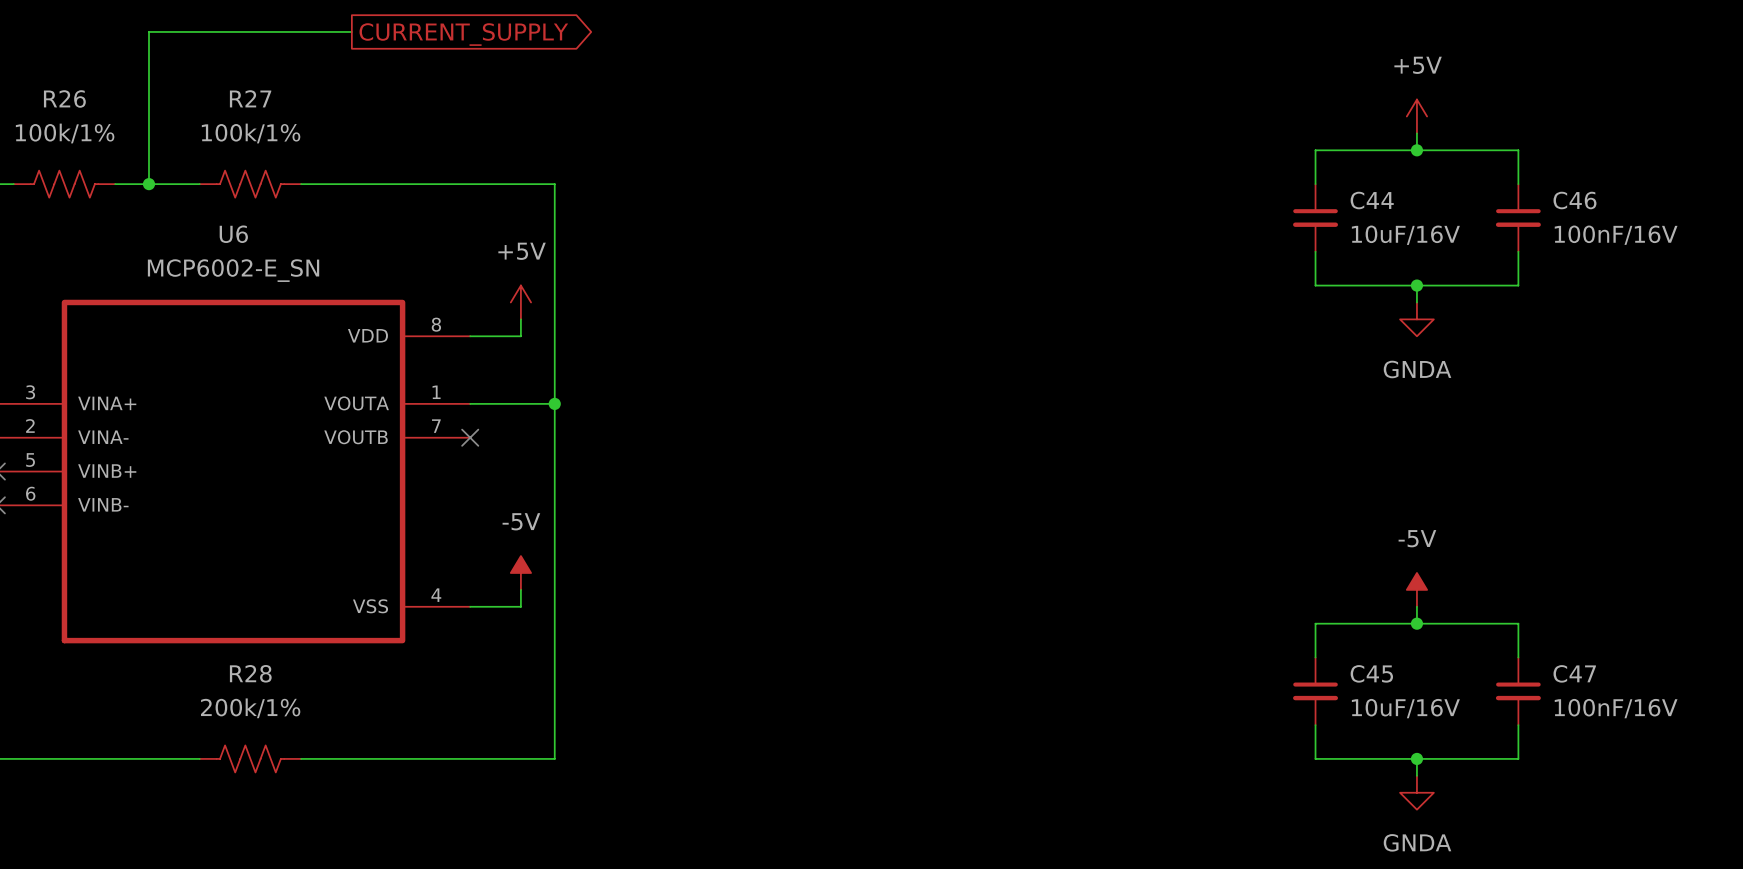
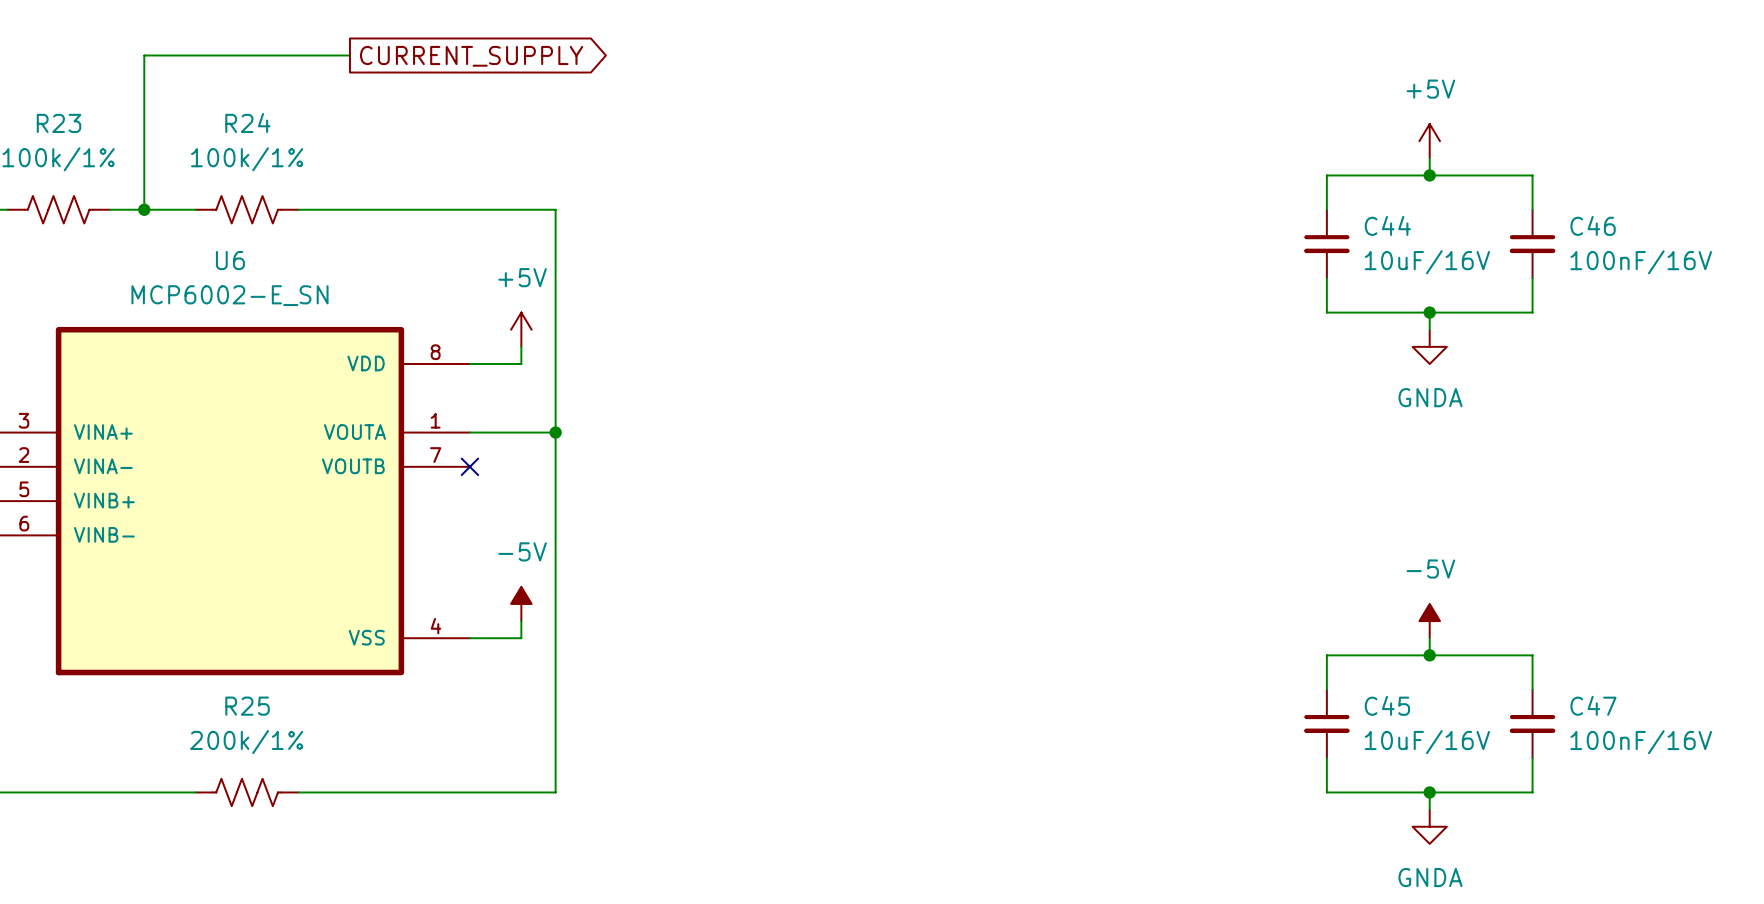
R26 name: R26 (64, 98) -> R23 (59, 123)
R27 name: R27 (250, 98) -> R24 (247, 123)
R28 name: R28 (250, 673) -> R25 (247, 706)

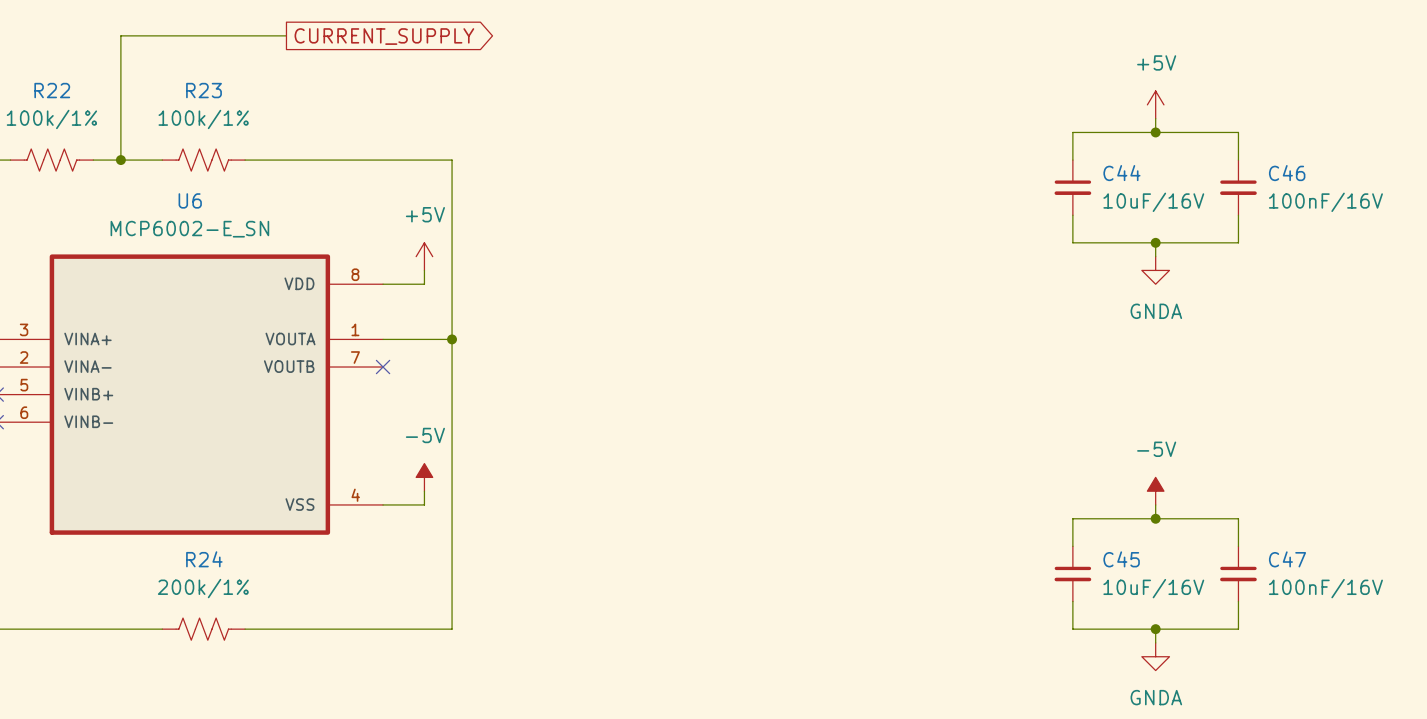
R23 name: R23 (59, 123) -> R22 (52, 90)
R24 name: R24 (247, 123) -> R23 (204, 90)
R25 name: R25 (247, 706) -> R24 (204, 559)

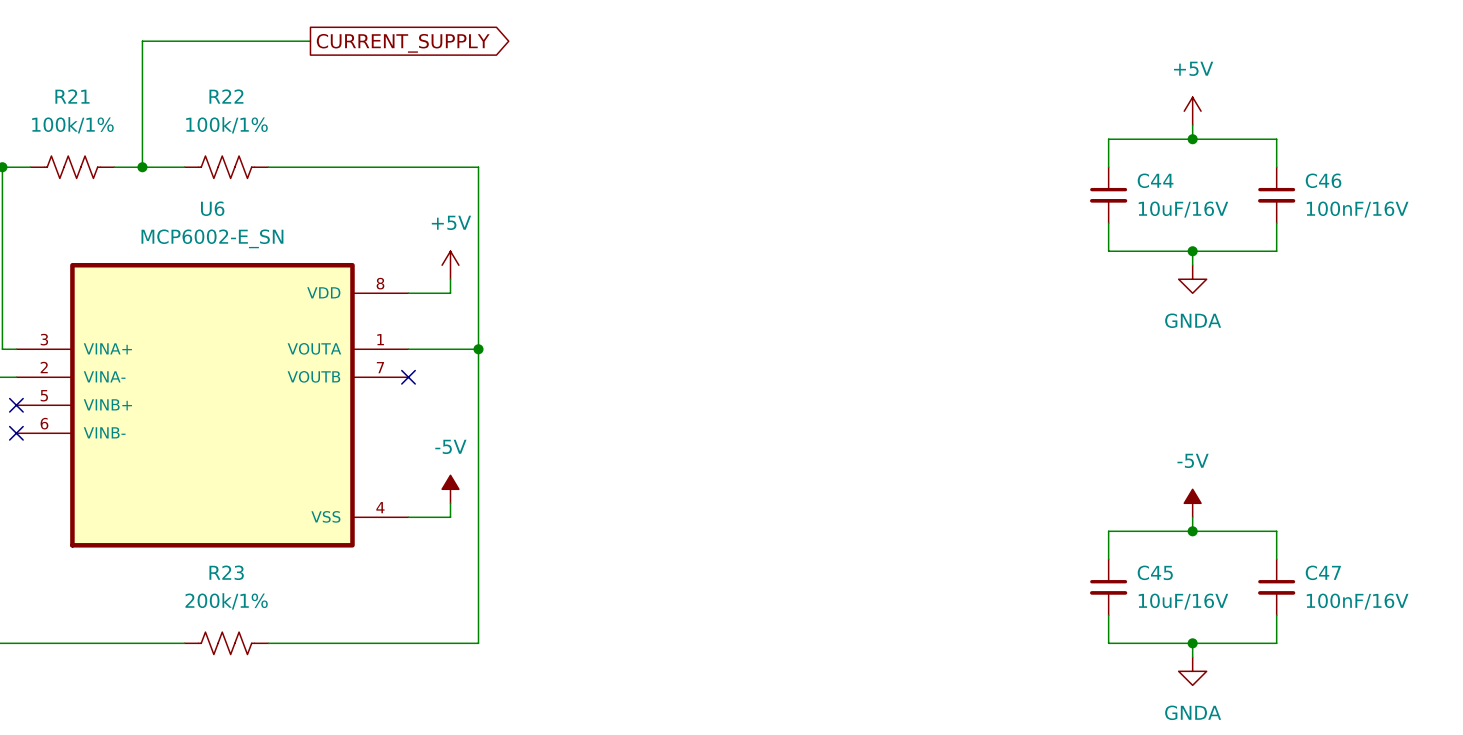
R22 name: R22 (52, 90) -> R21 (72, 96)
R23 name: R23 (204, 90) -> R22 (226, 96)
R24 name: R24 (204, 559) -> R23 (226, 572)

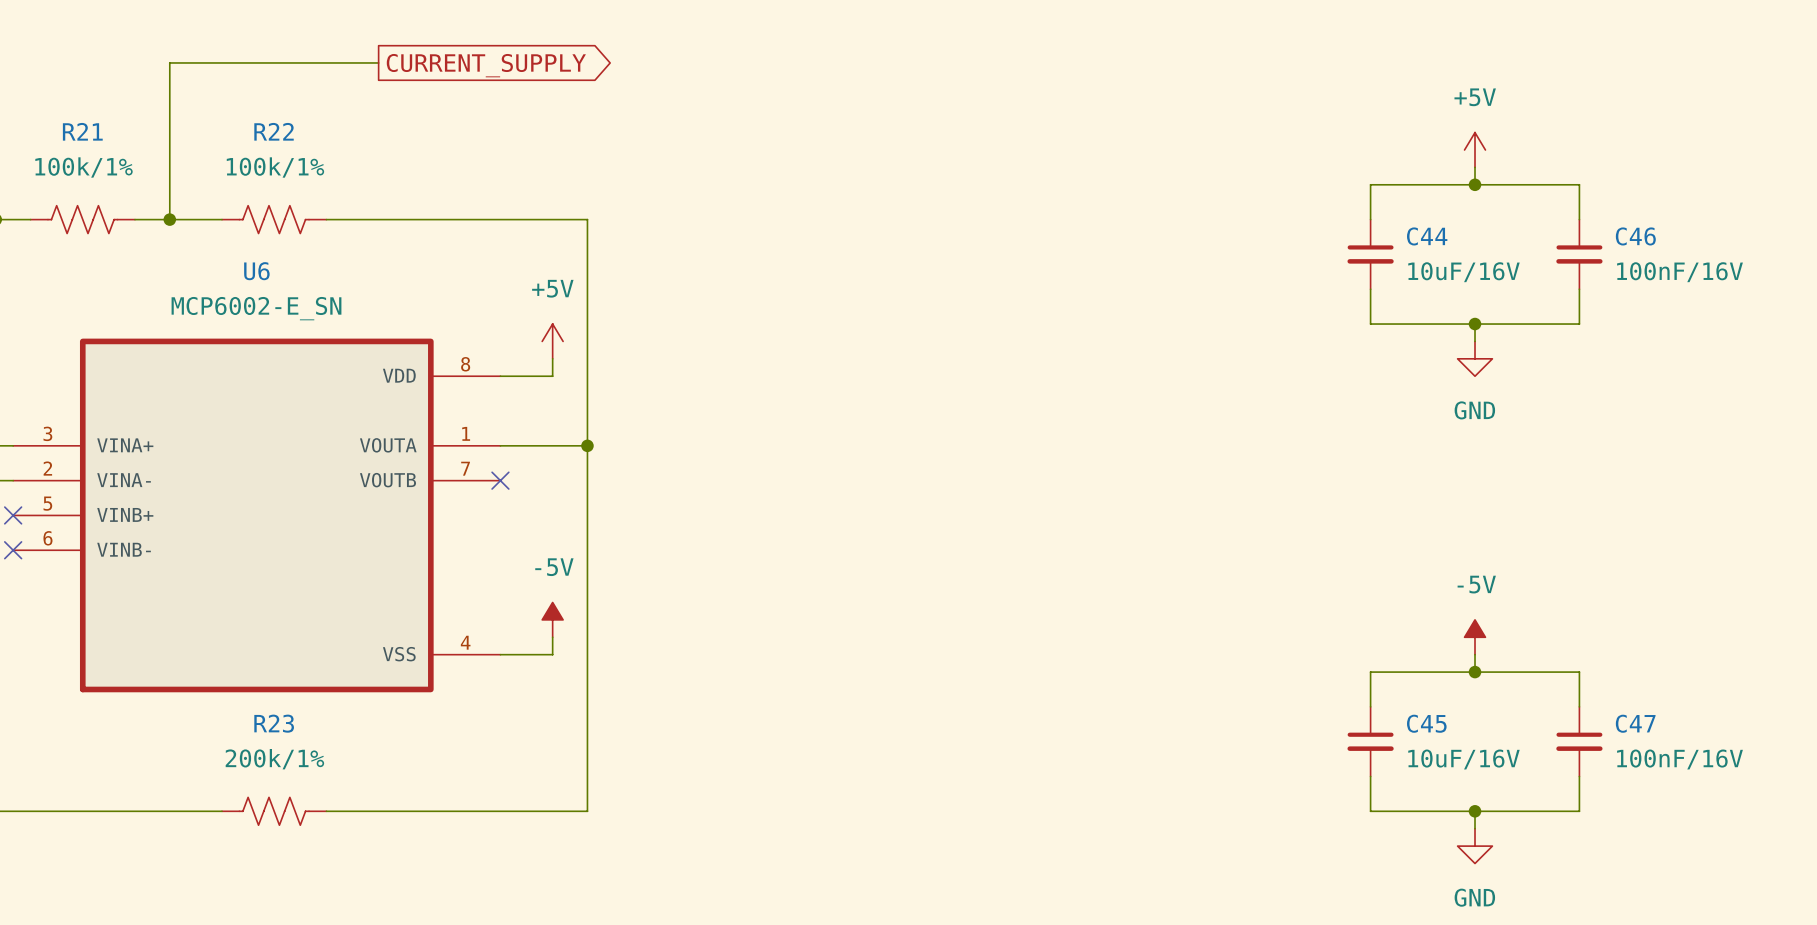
power symbol: GNDA (1192, 279) -> GND (1475, 358)
power symbol: GNDA (1192, 671) -> GND (1475, 846)

